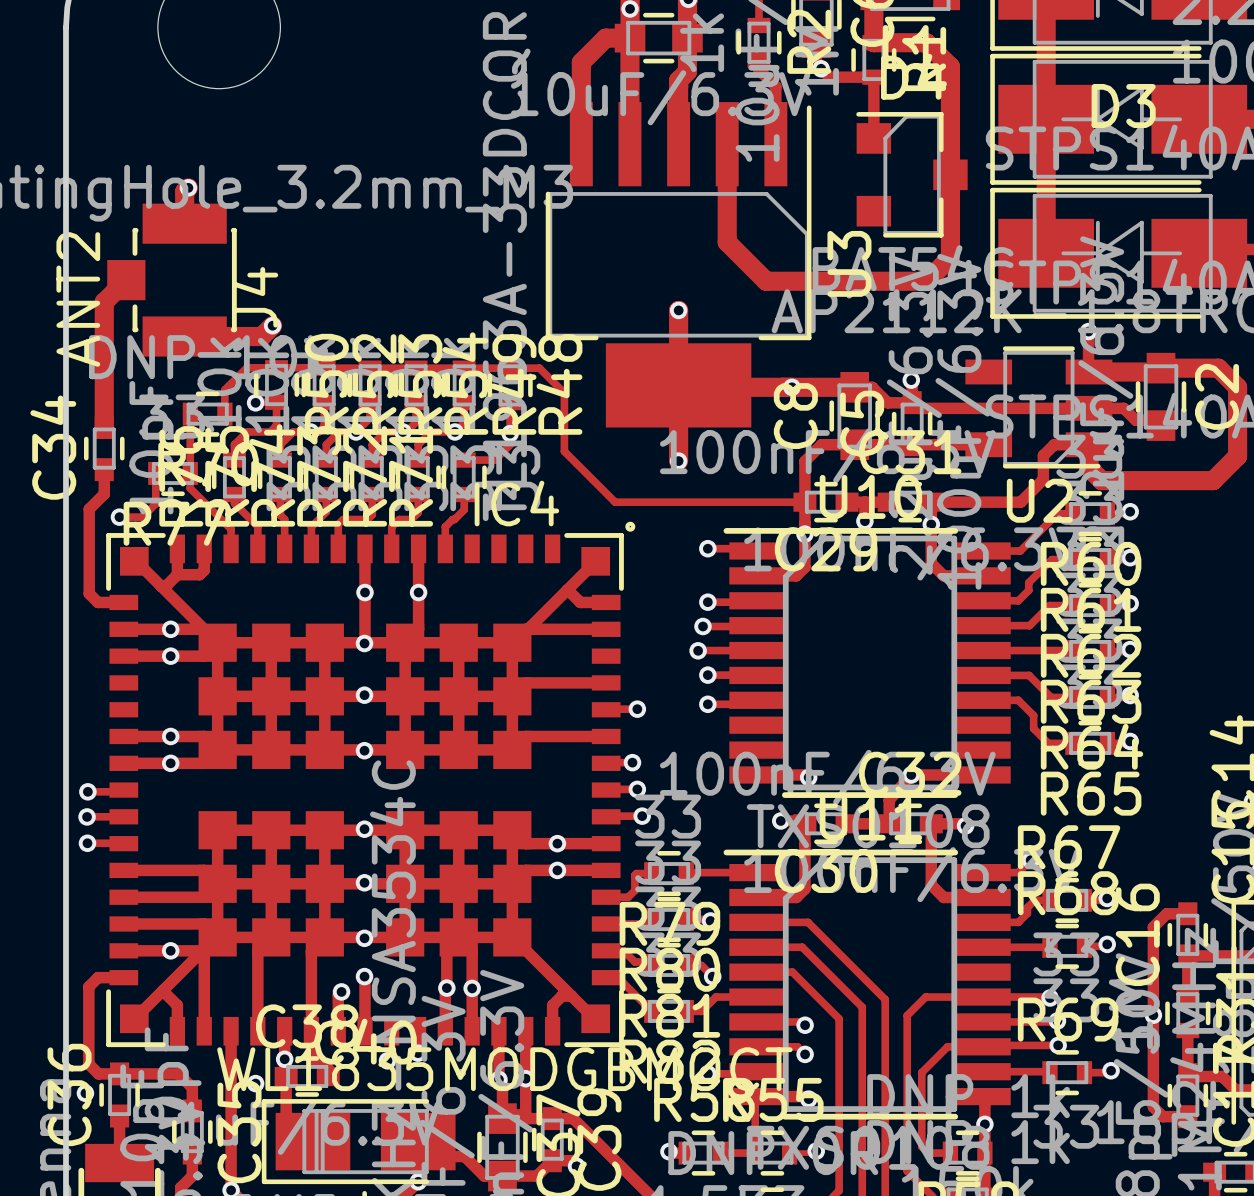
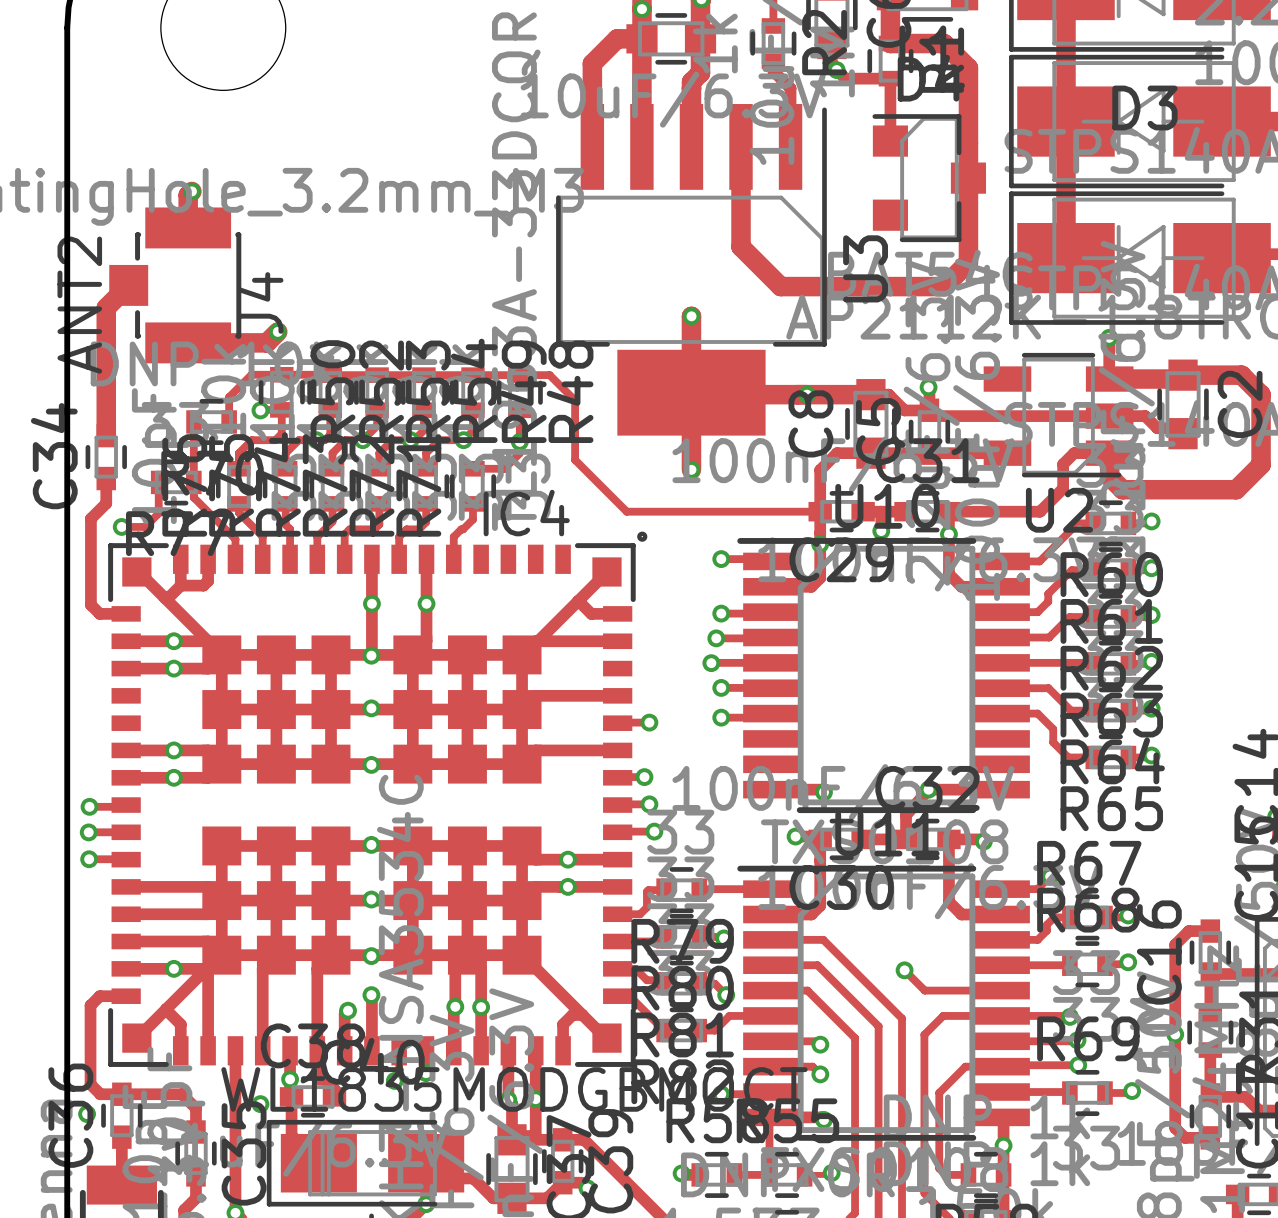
track: none -> (904, 970) (924, 990) (1001, 990)
via: none -> (904, 970)

